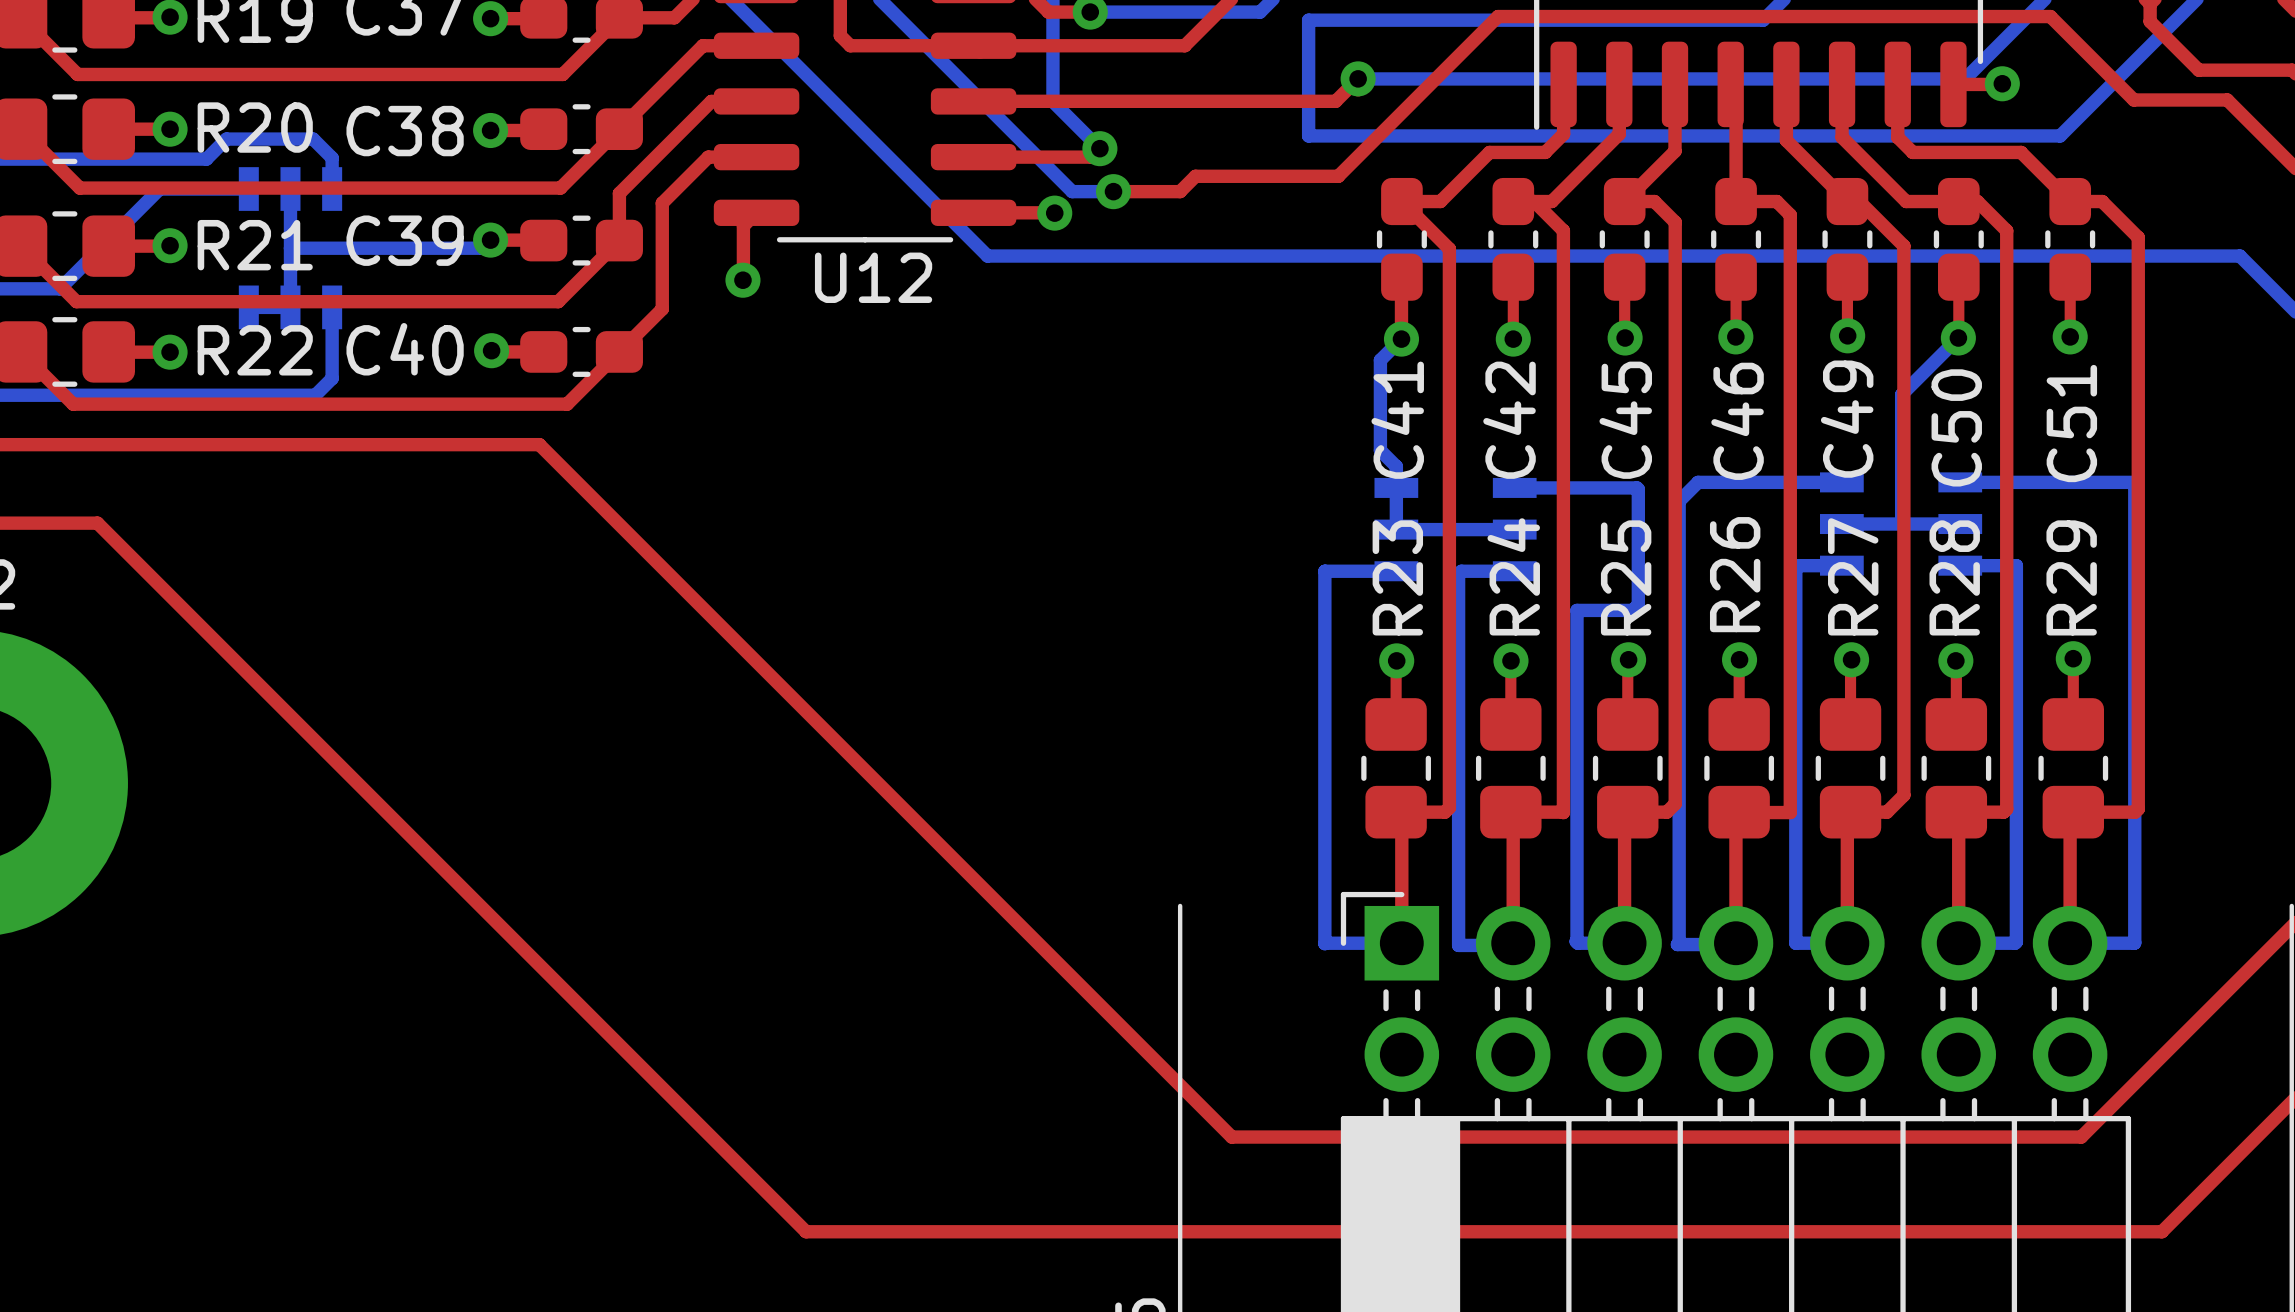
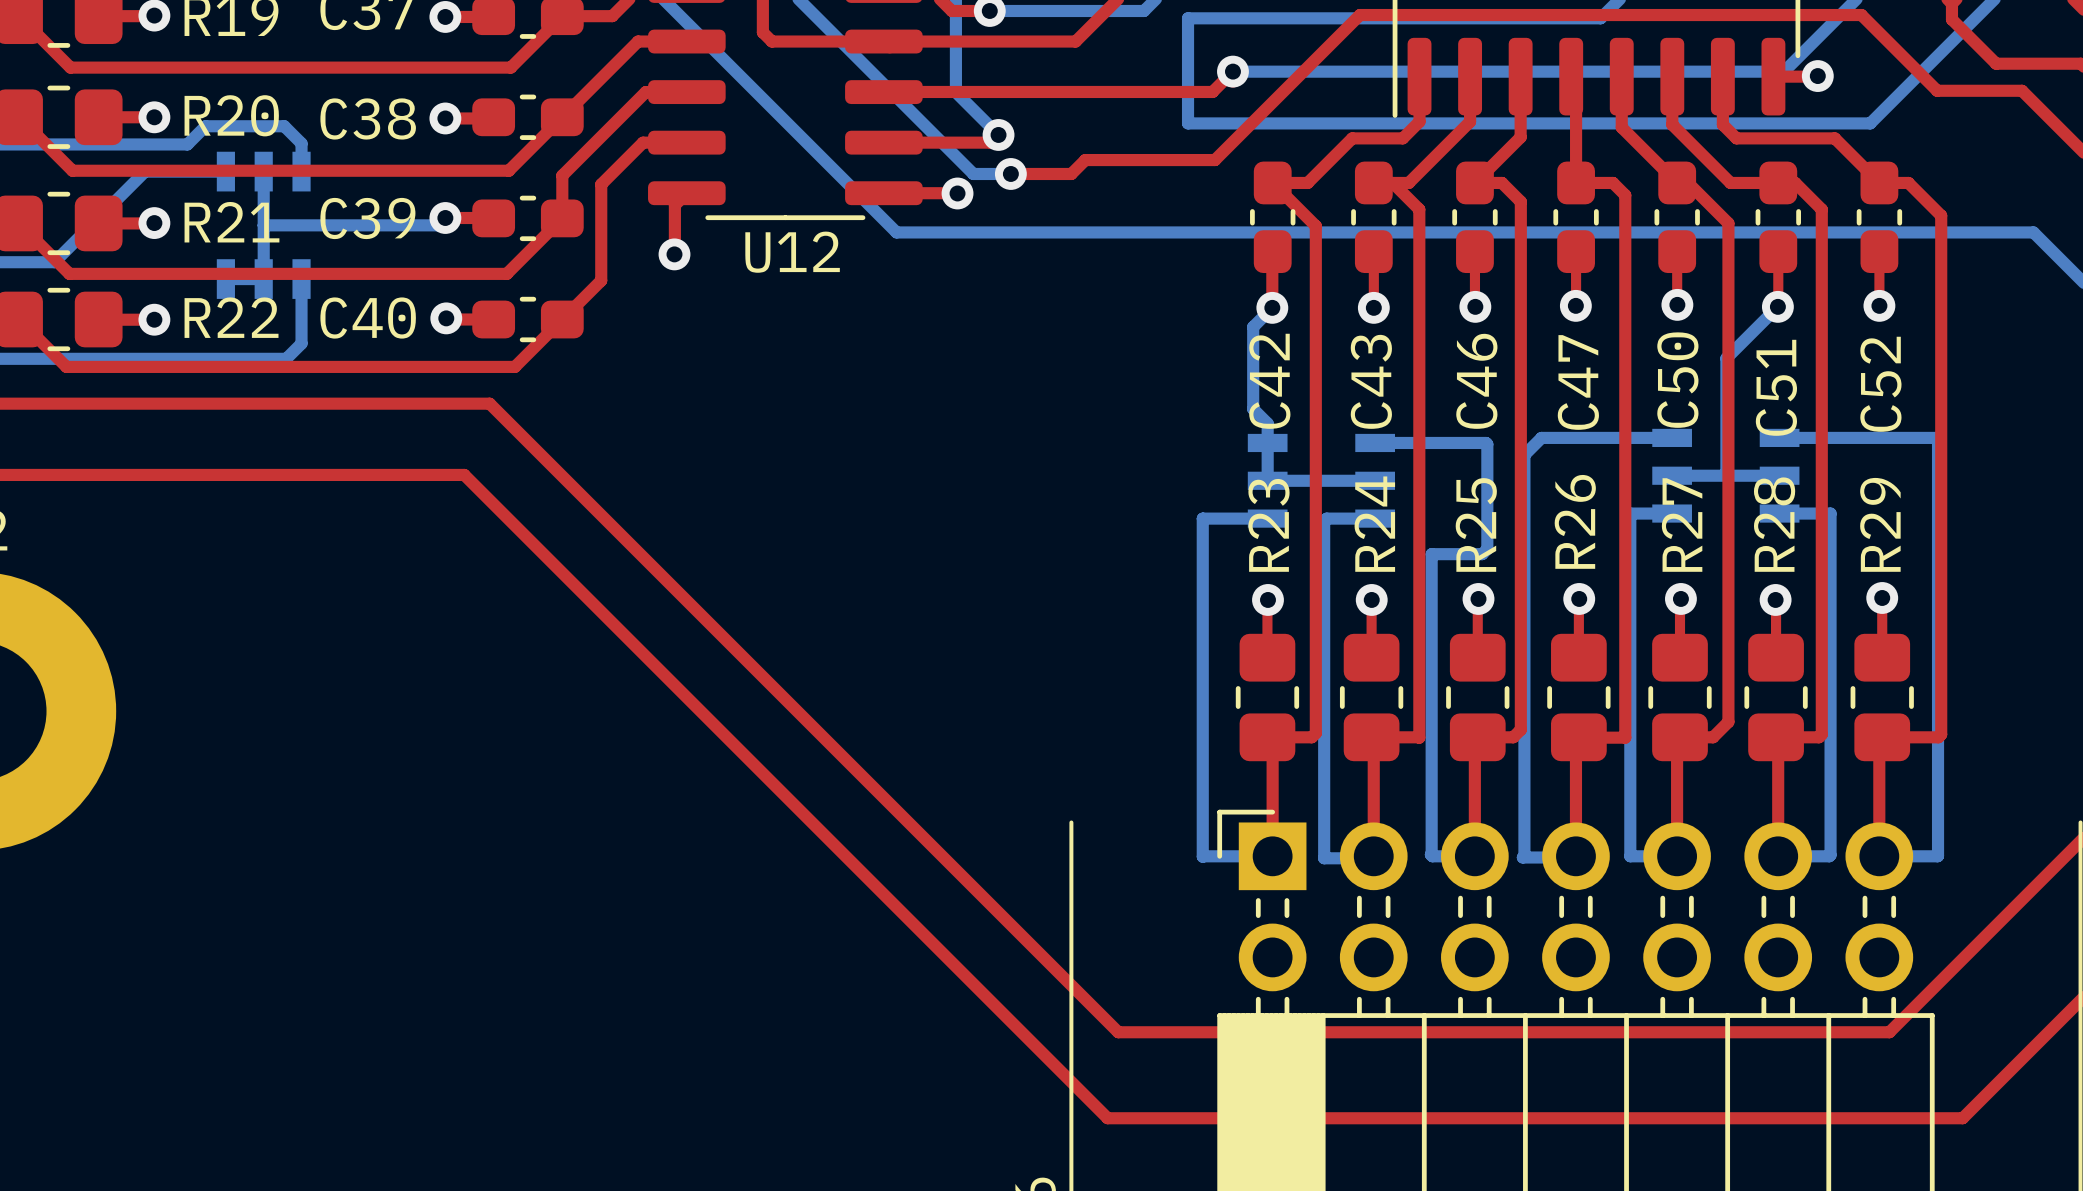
C49 name: C49 (1847, 419) -> C50 (1677, 380)
C41 name: C41 (1397, 420) -> C42 (1269, 381)
C42 name: C42 (1509, 420) -> C43 (1371, 381)
C45 name: C45 (1625, 420) -> C46 (1476, 381)
C46 name: C46 (1737, 421) -> C47 (1578, 382)
C51 name: C51 (2071, 423) -> C52 (1880, 384)
C50 name: C50 (1956, 427) -> C51 (1776, 387)
top track: (97, 523) (806, 1231) (1220, 1231) -> (88, 474) (464, 474) (1107, 1118)

